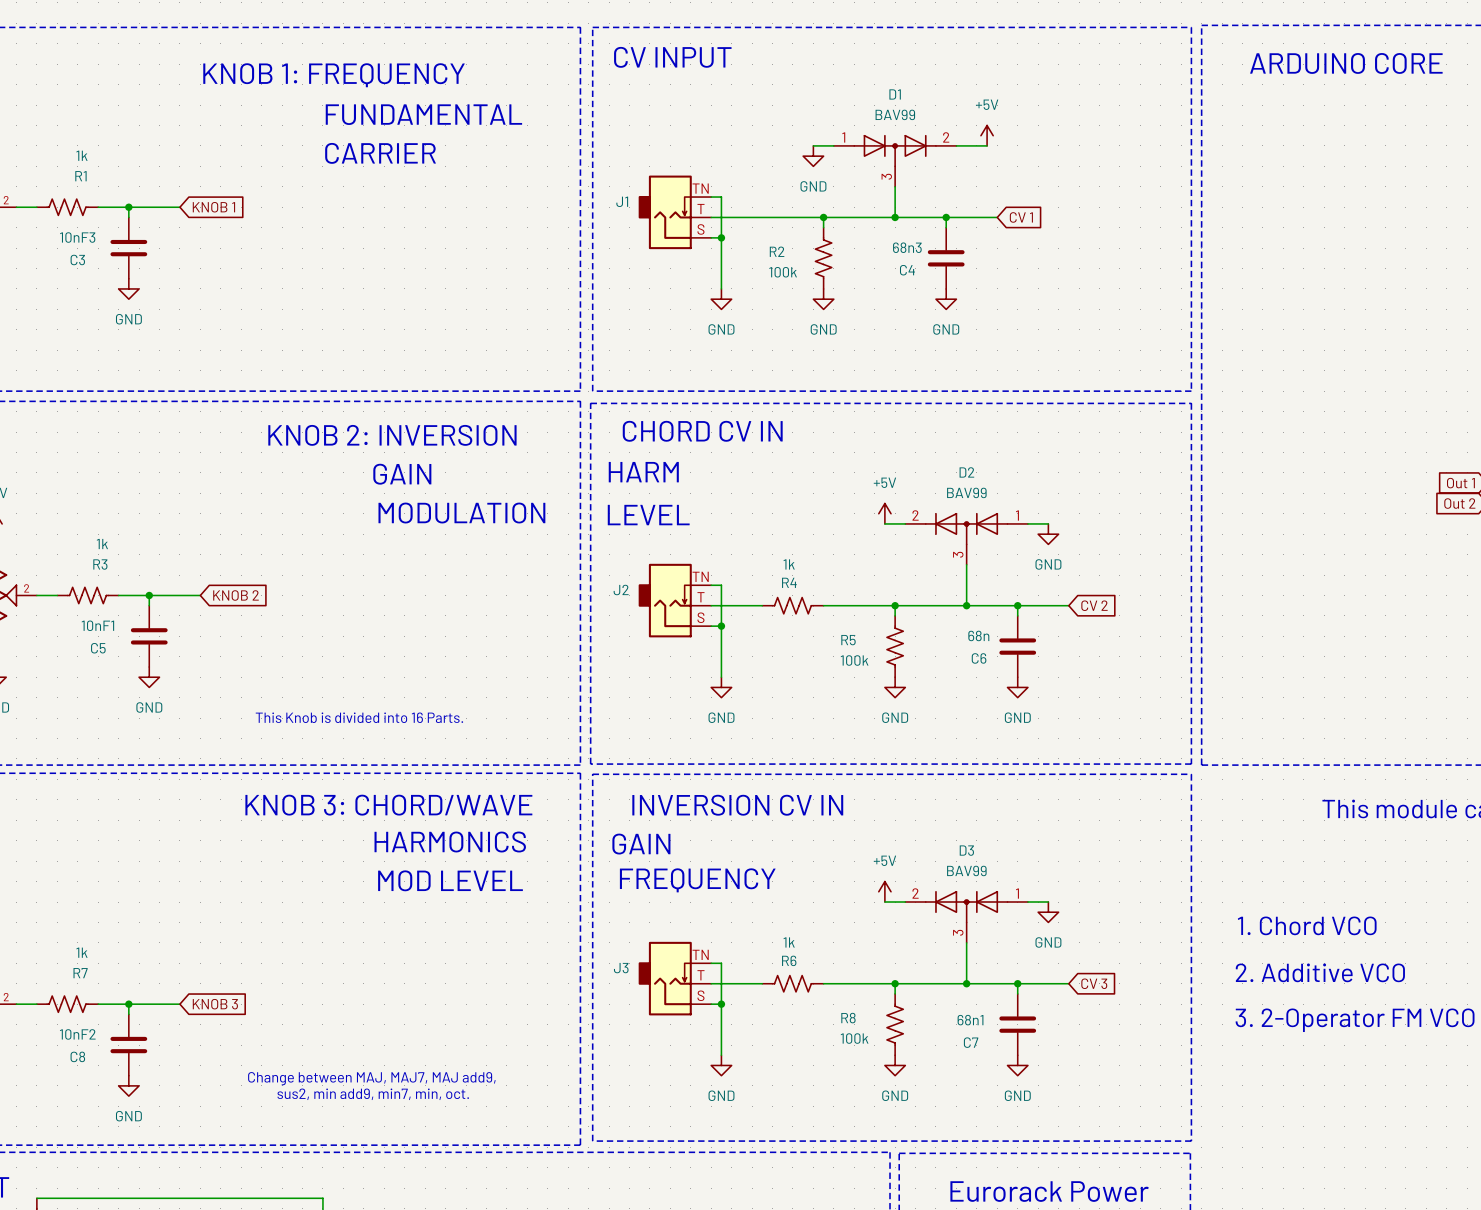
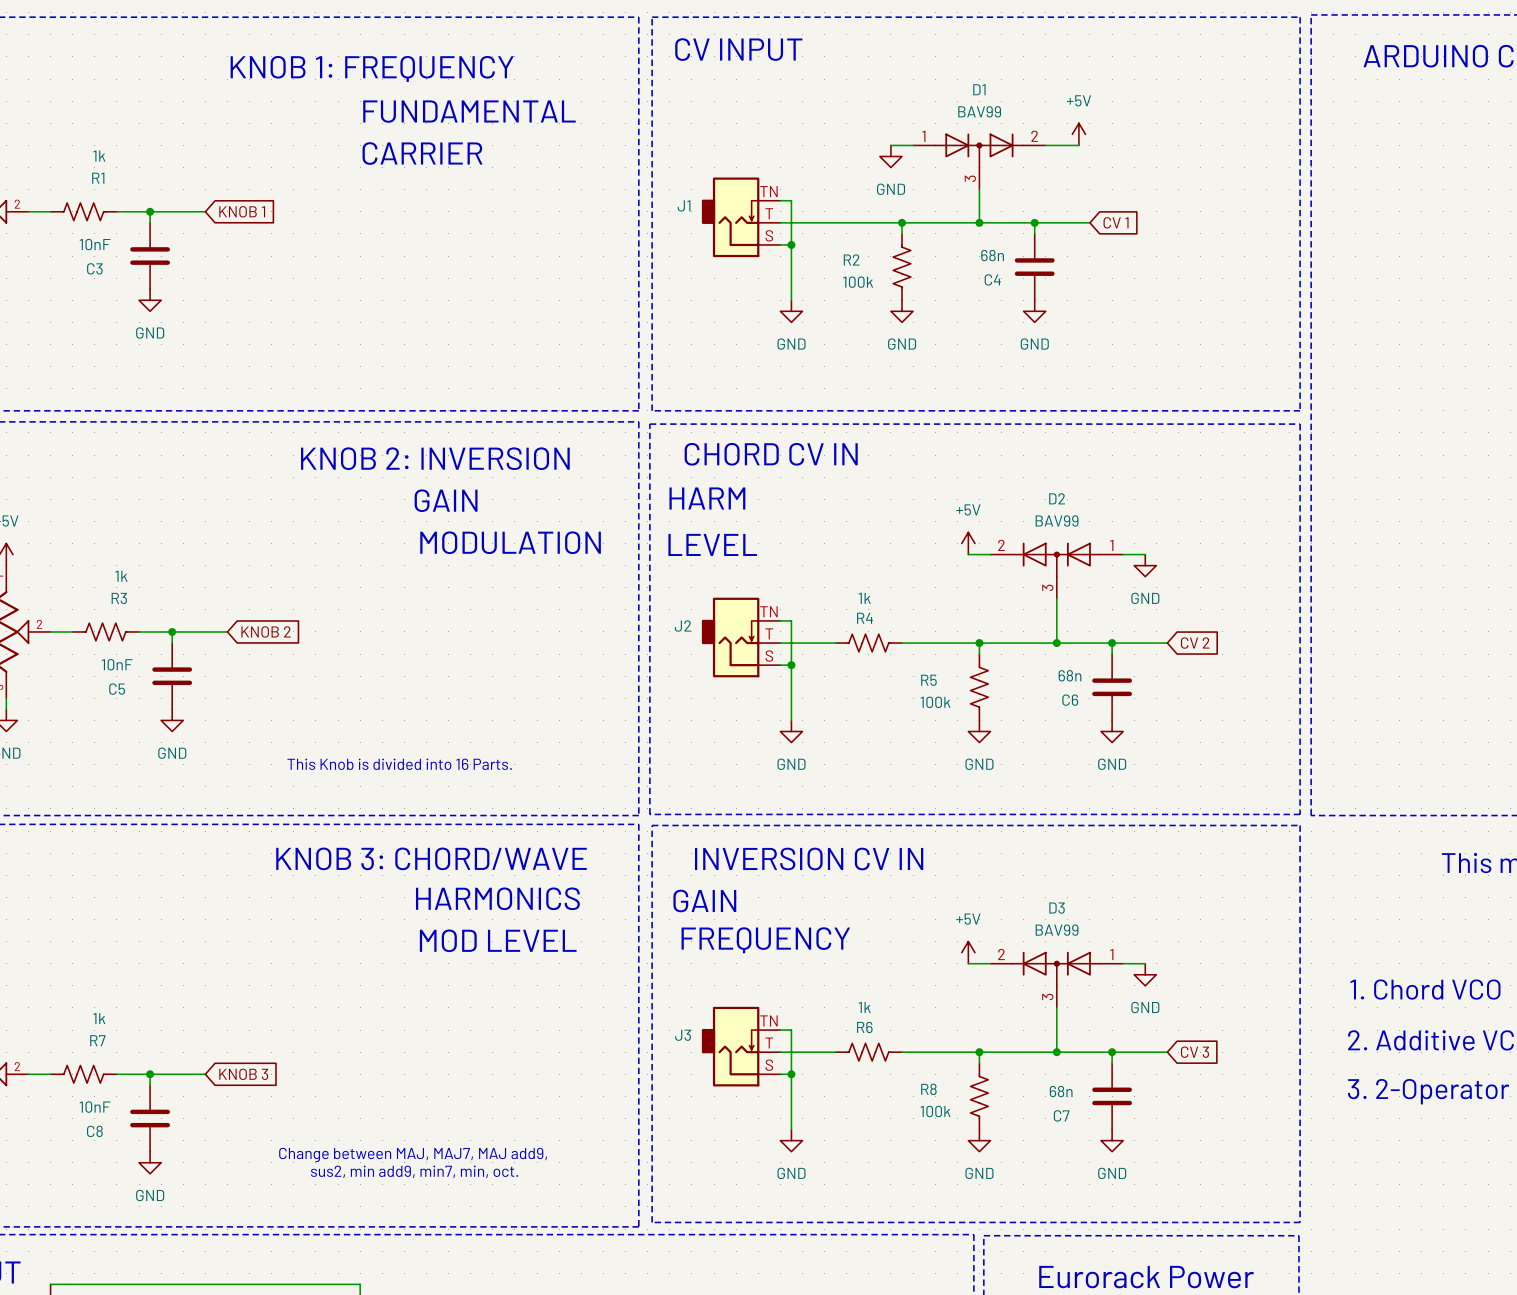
C3 value: 10nF3 (77, 237) -> 10nF (95, 244)
C4 value: 68n3 (907, 247) -> 68n (992, 255)
C5 value: 10nF1 (97, 625) -> 10nF (117, 664)
C7 value: 68n1 (970, 1020) -> 68n (1061, 1091)
C8 value: 10nF2 (77, 1034) -> 10nF (95, 1107)

